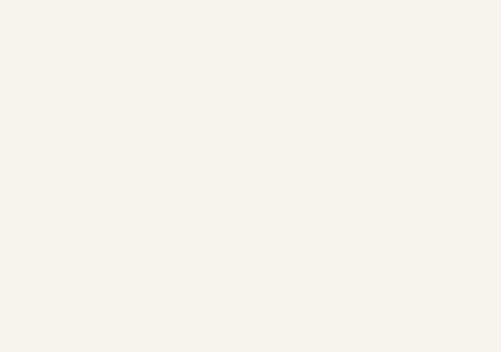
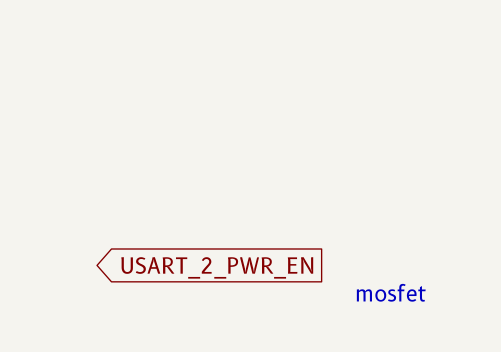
global label: none -> USART_2_PWR_EN (217, 267)
text: none -> mosfet (391, 292)

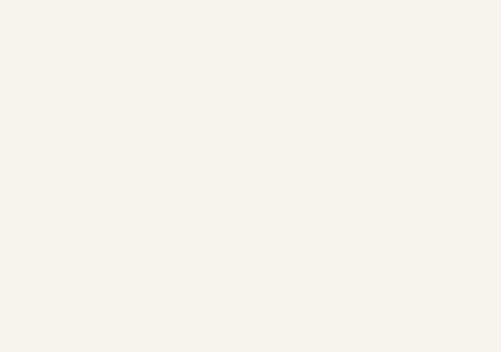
global label: USART_2_PWR_EN (217, 267) -> none
text: mosfet (391, 292) -> none

